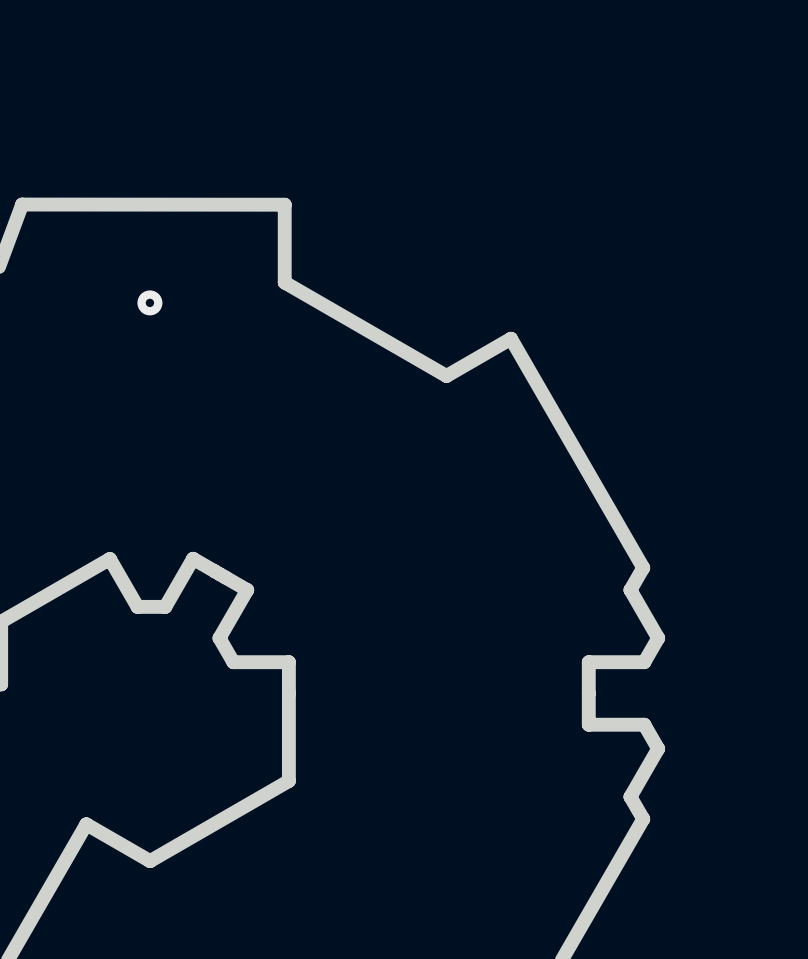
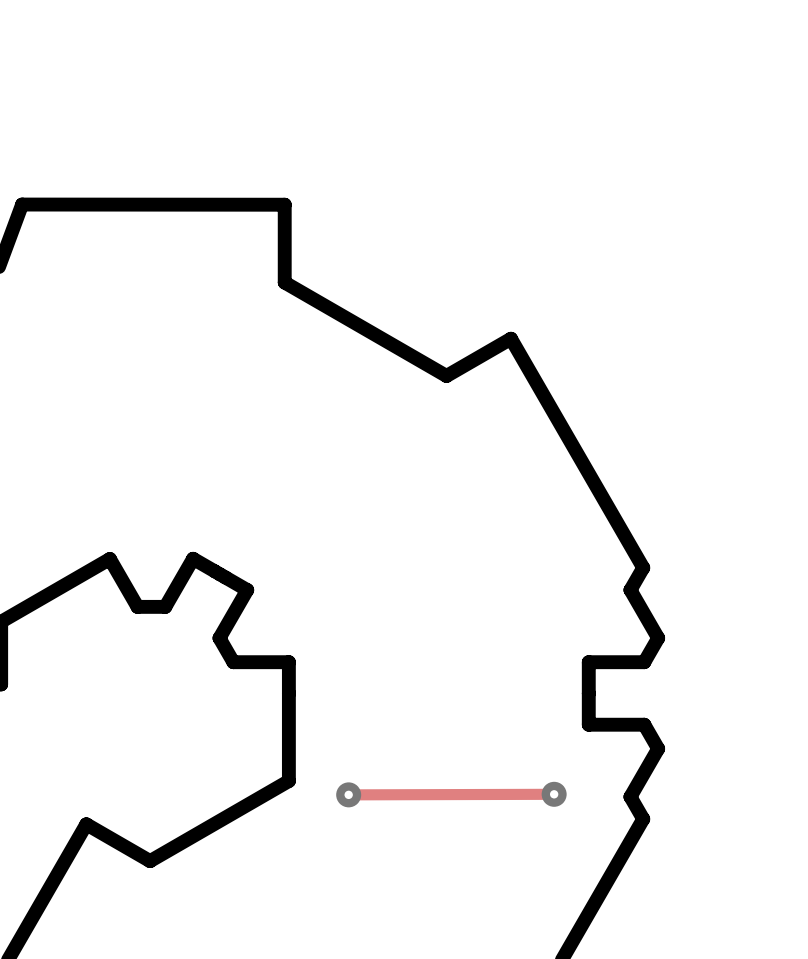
via: (149, 302) -> none
via: none -> (348, 794)
track: none -> (554, 794) (348, 794)
via: none -> (554, 794)

